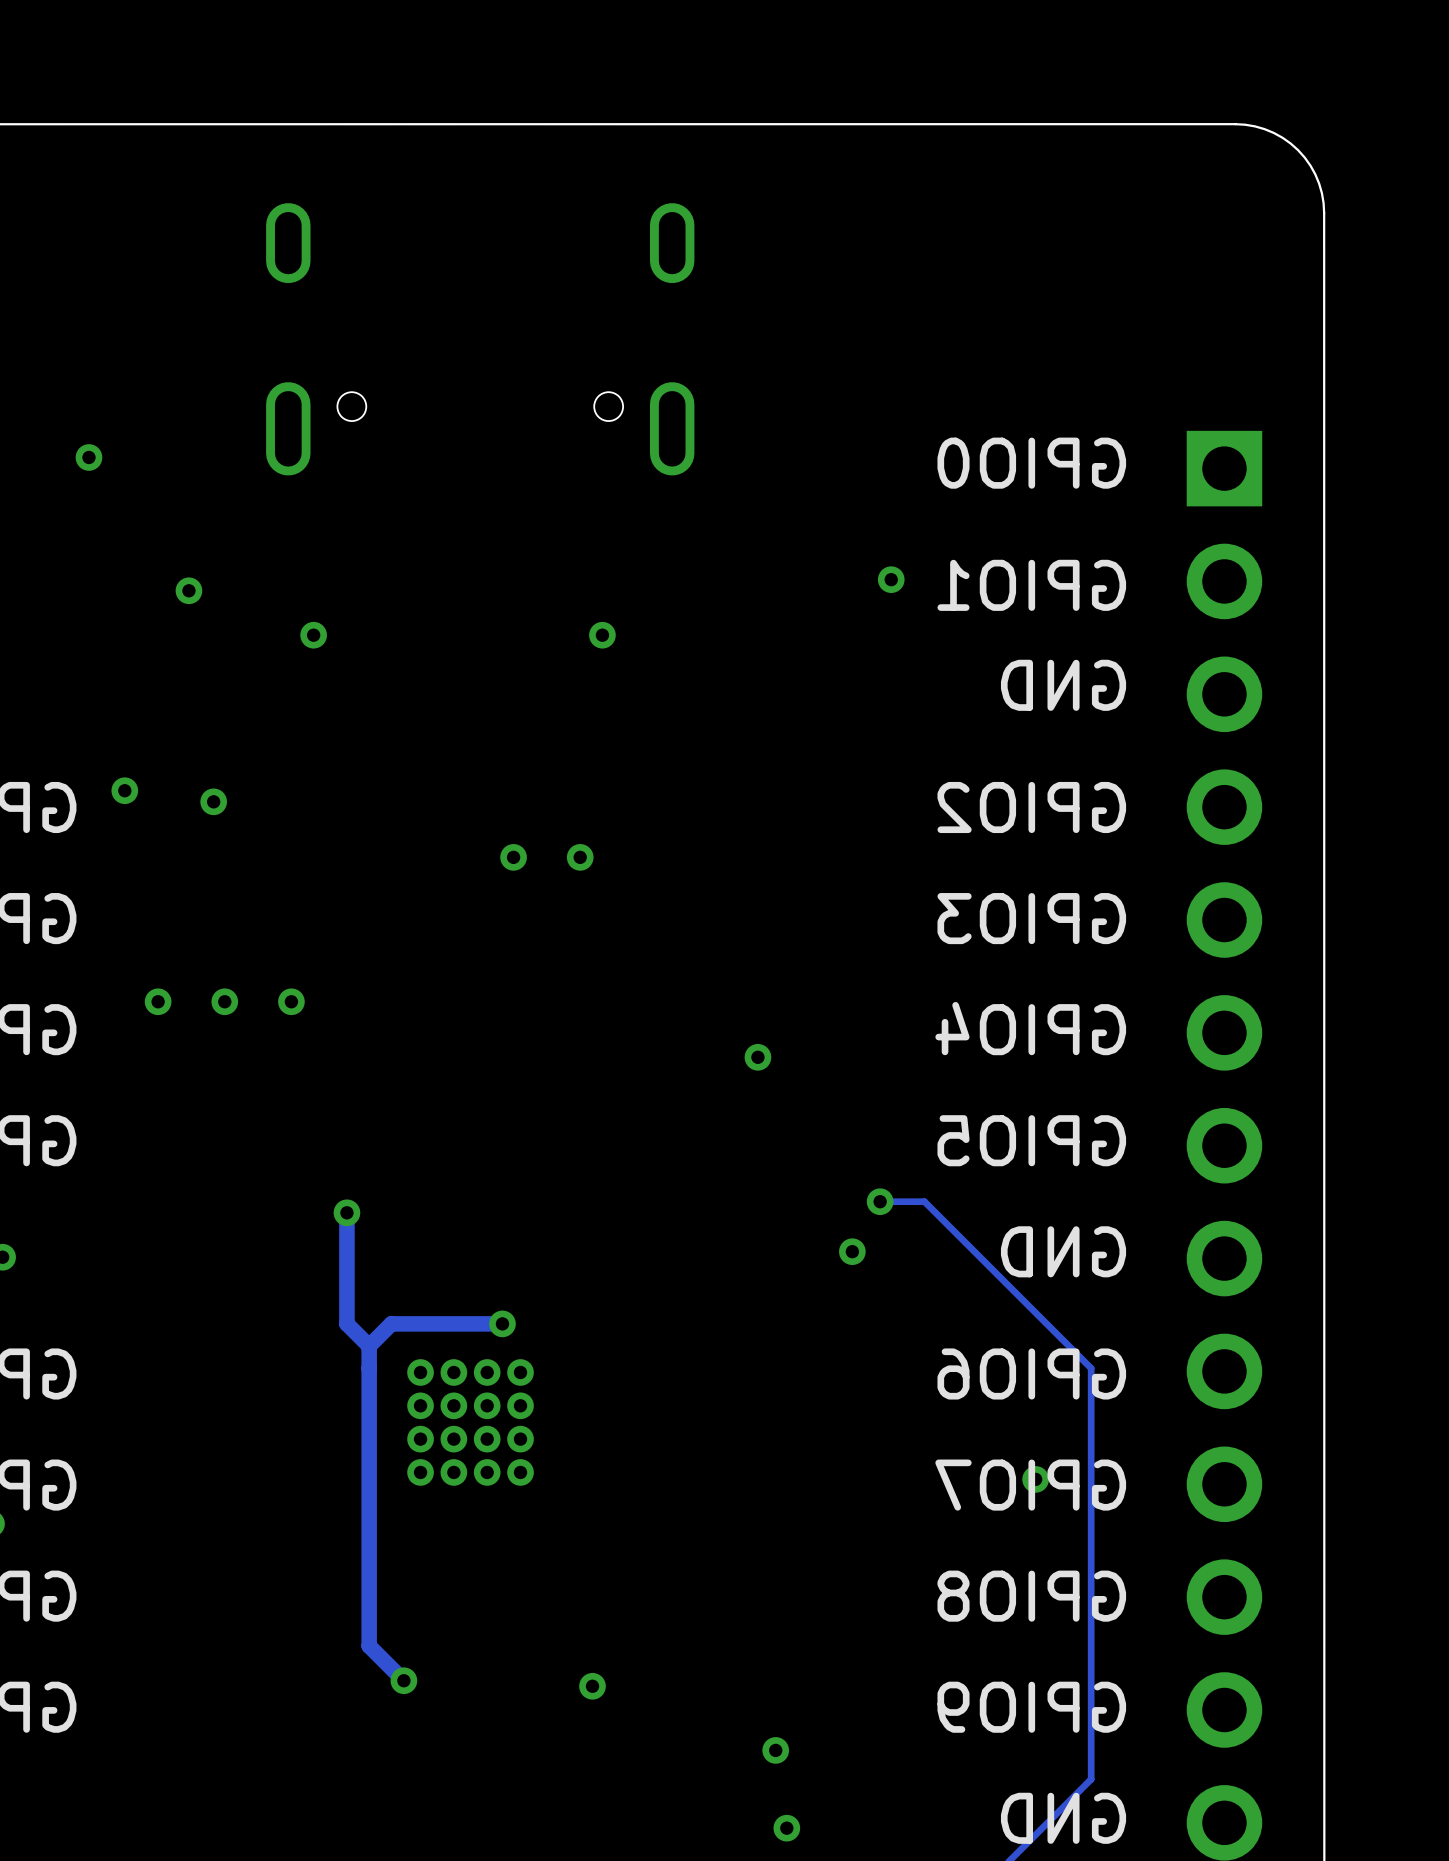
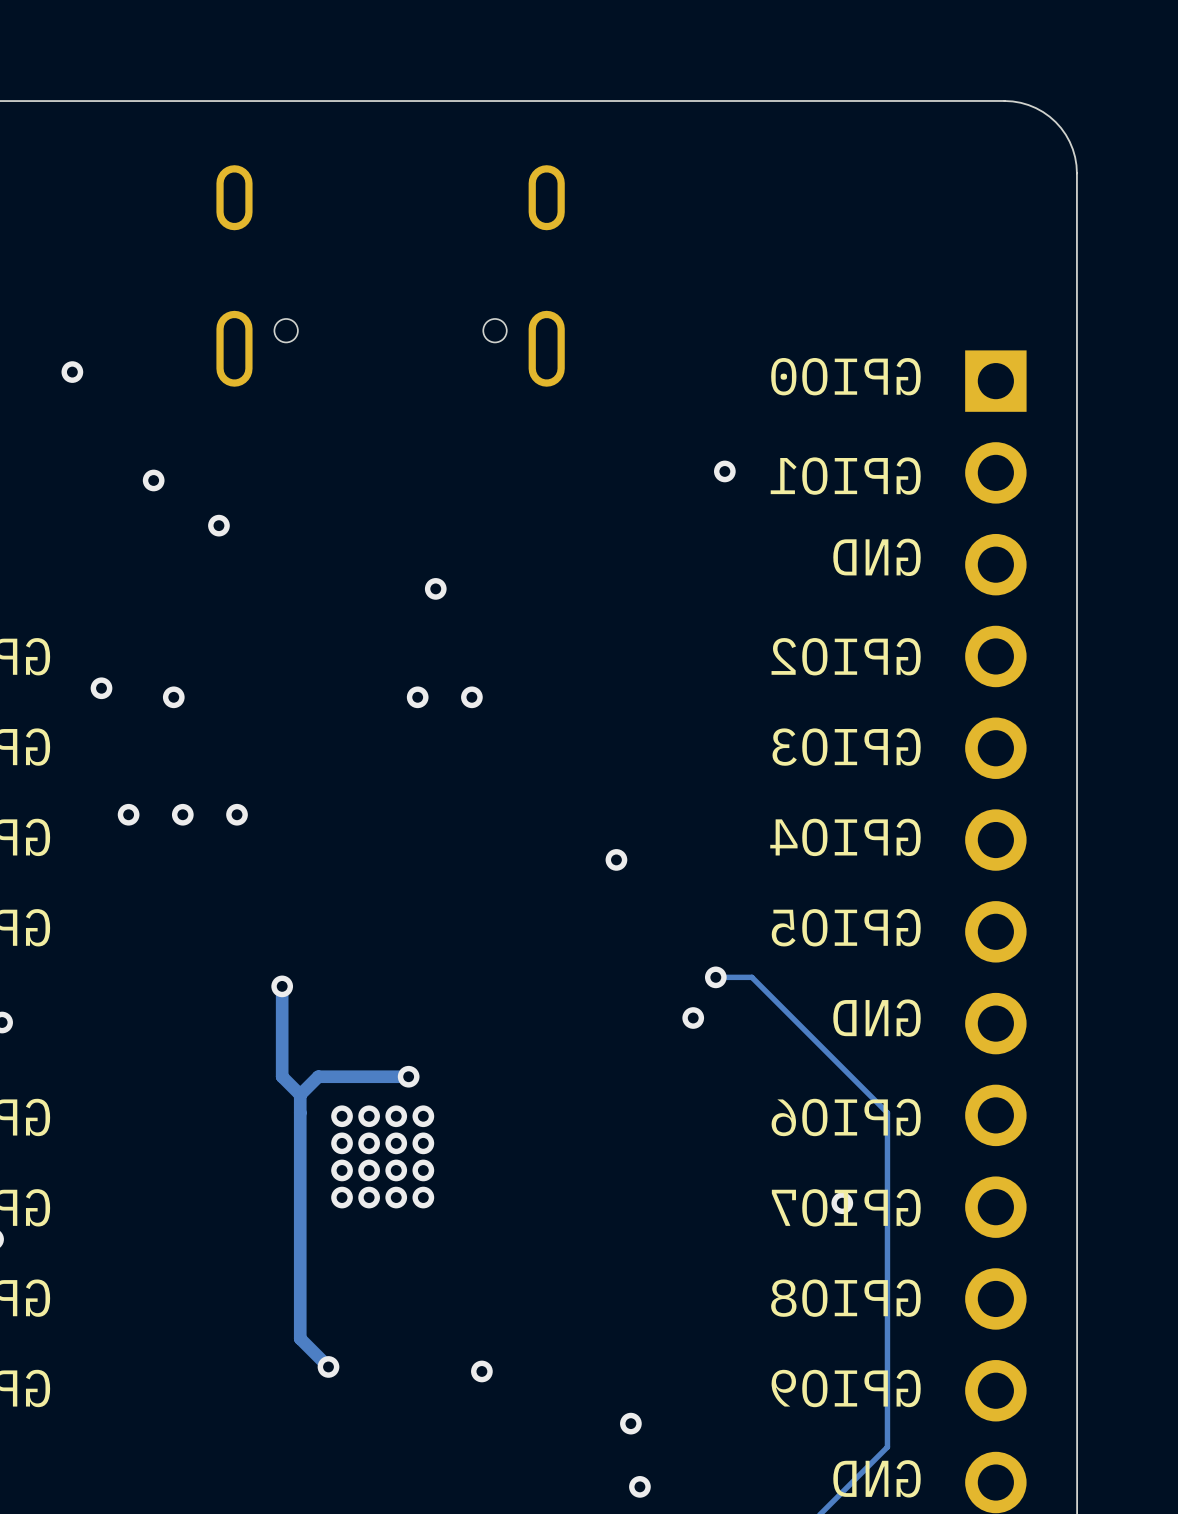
via position: (313, 635) -> (218, 525)
via position: (602, 635) -> (435, 588)
via: (124, 790) -> none
via: (213, 801) -> none
via: none -> (101, 688)
via: none -> (173, 697)

